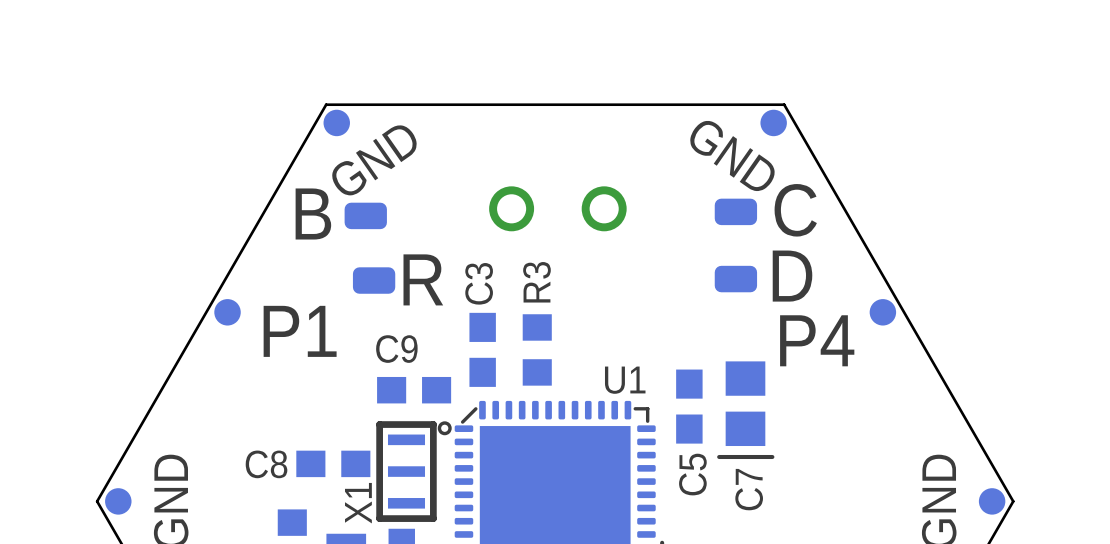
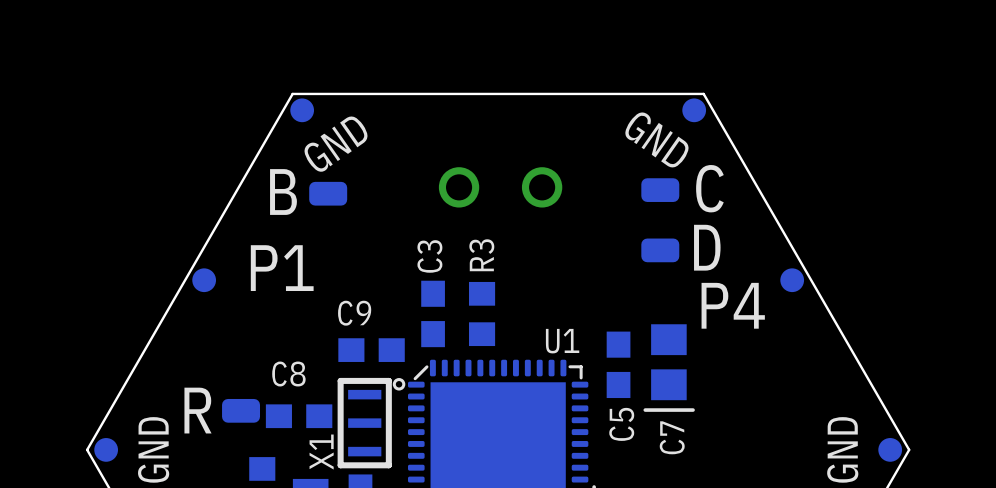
text position: R (423, 279) -> R (198, 410)
part position: (374, 280) -> (241, 410)
text position: P1 (300, 331) -> P1 (282, 268)
C8 name position: C8 (266, 464) -> C8 (288, 374)

